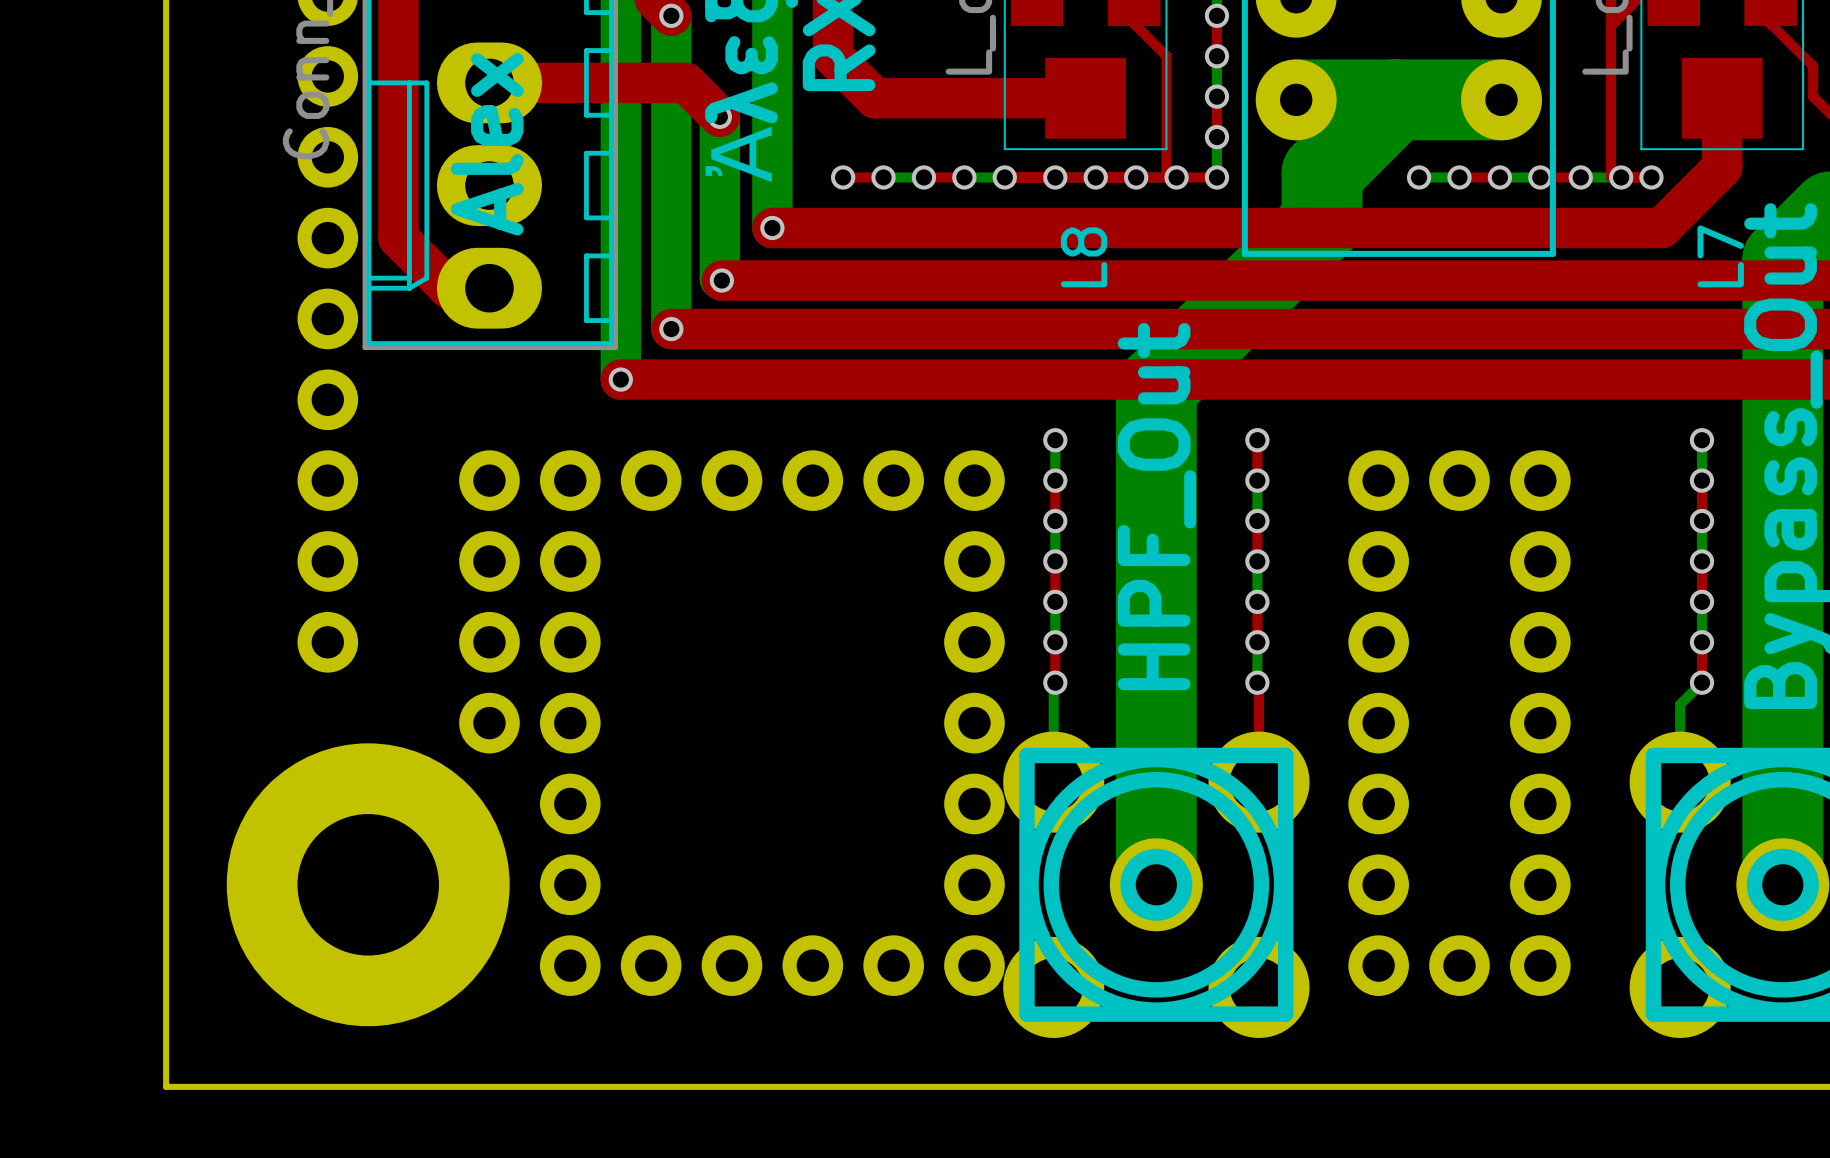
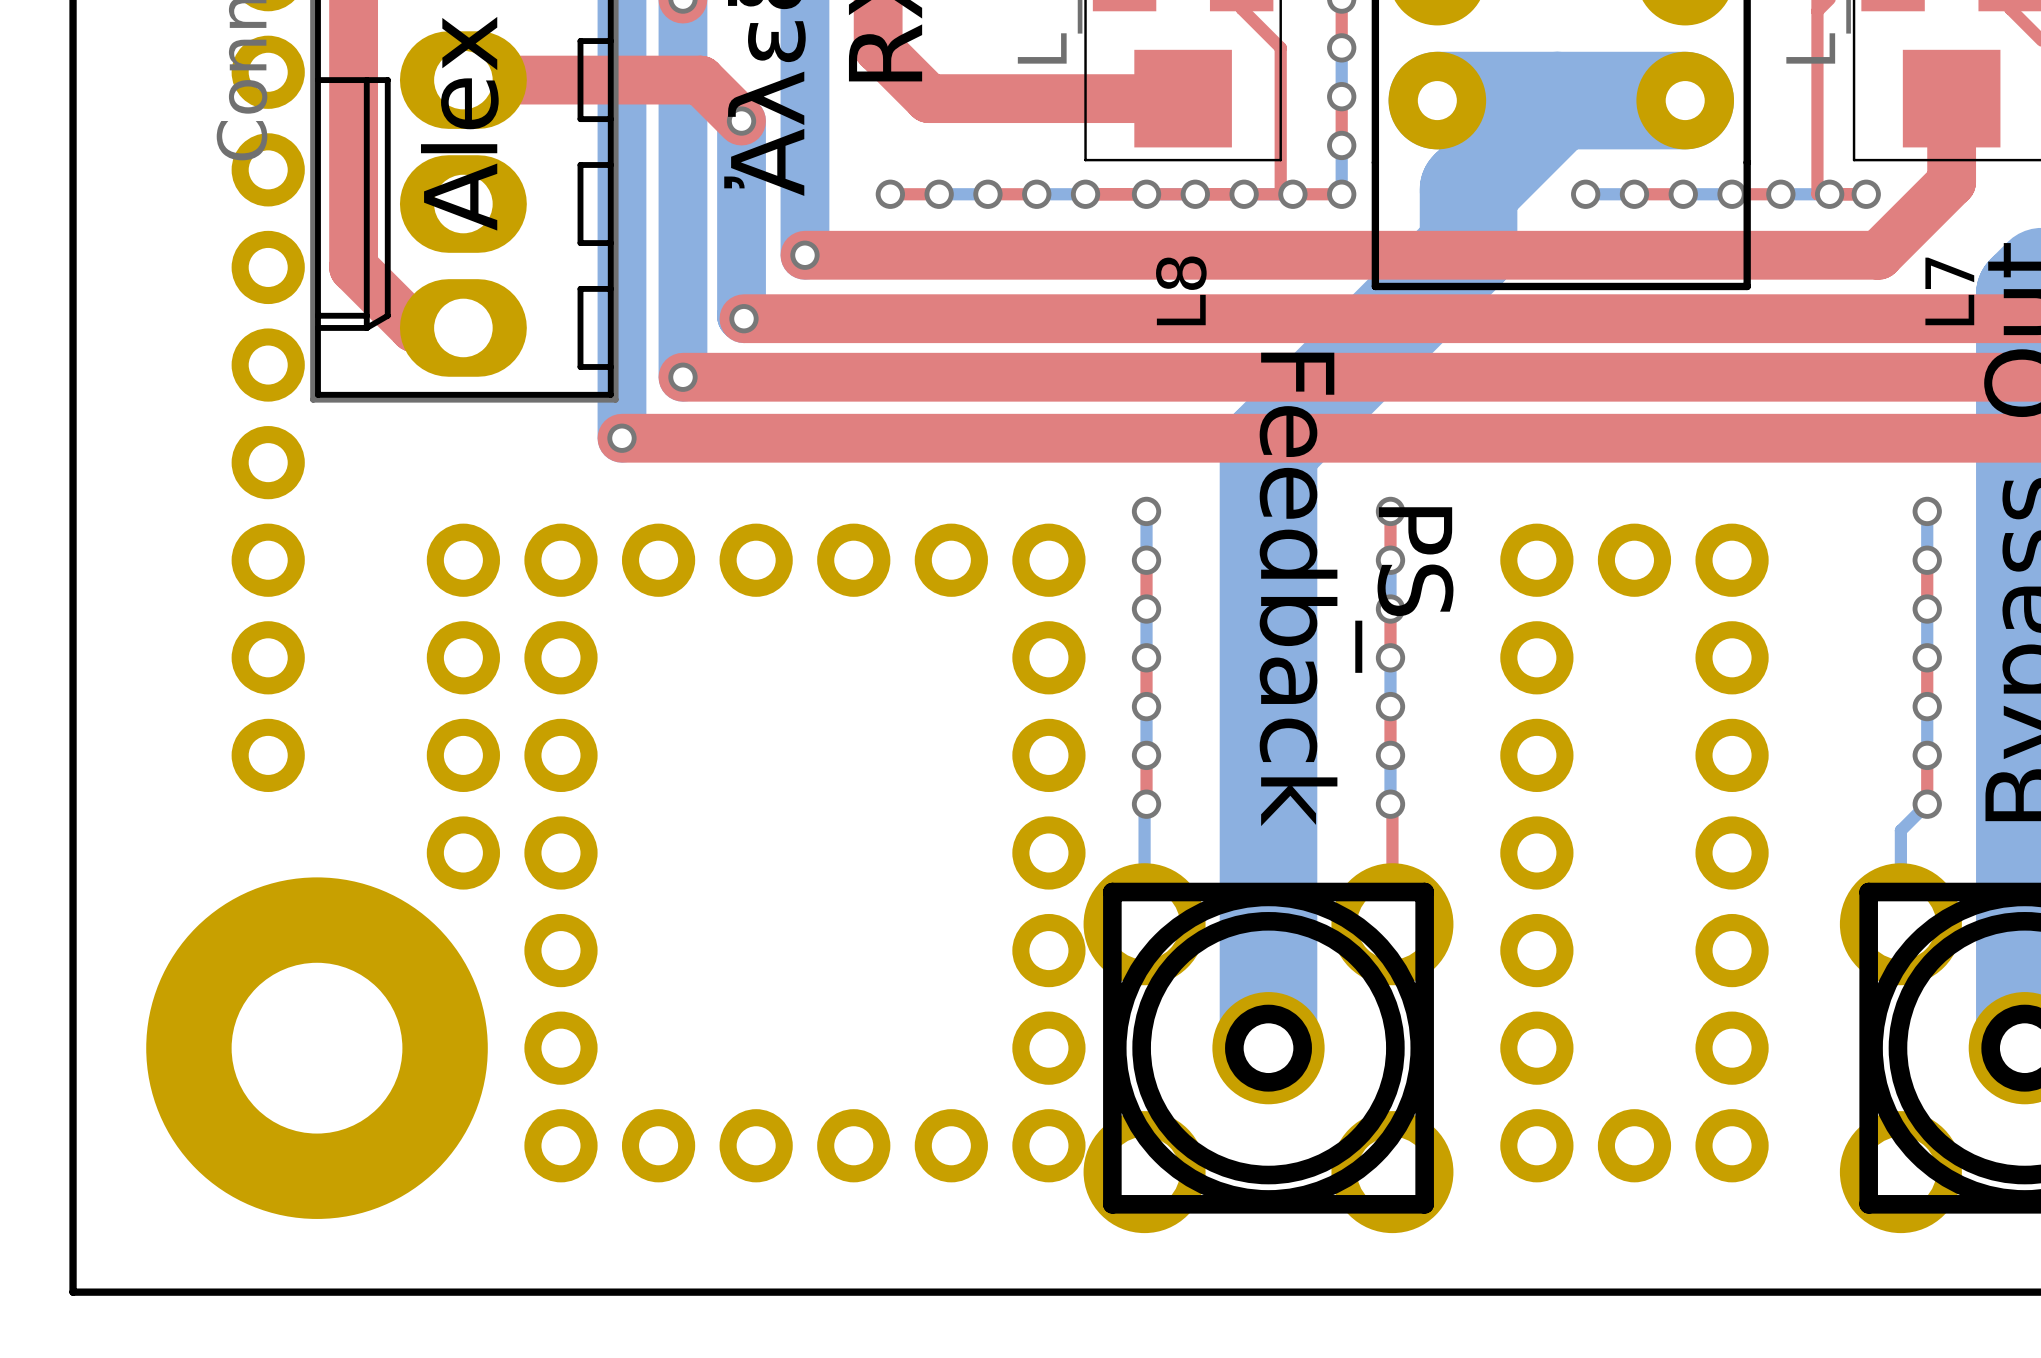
text: HPF_Out (1156, 506) -> Feedback (1298, 589)
text: none -> PS_ (1404, 590)

